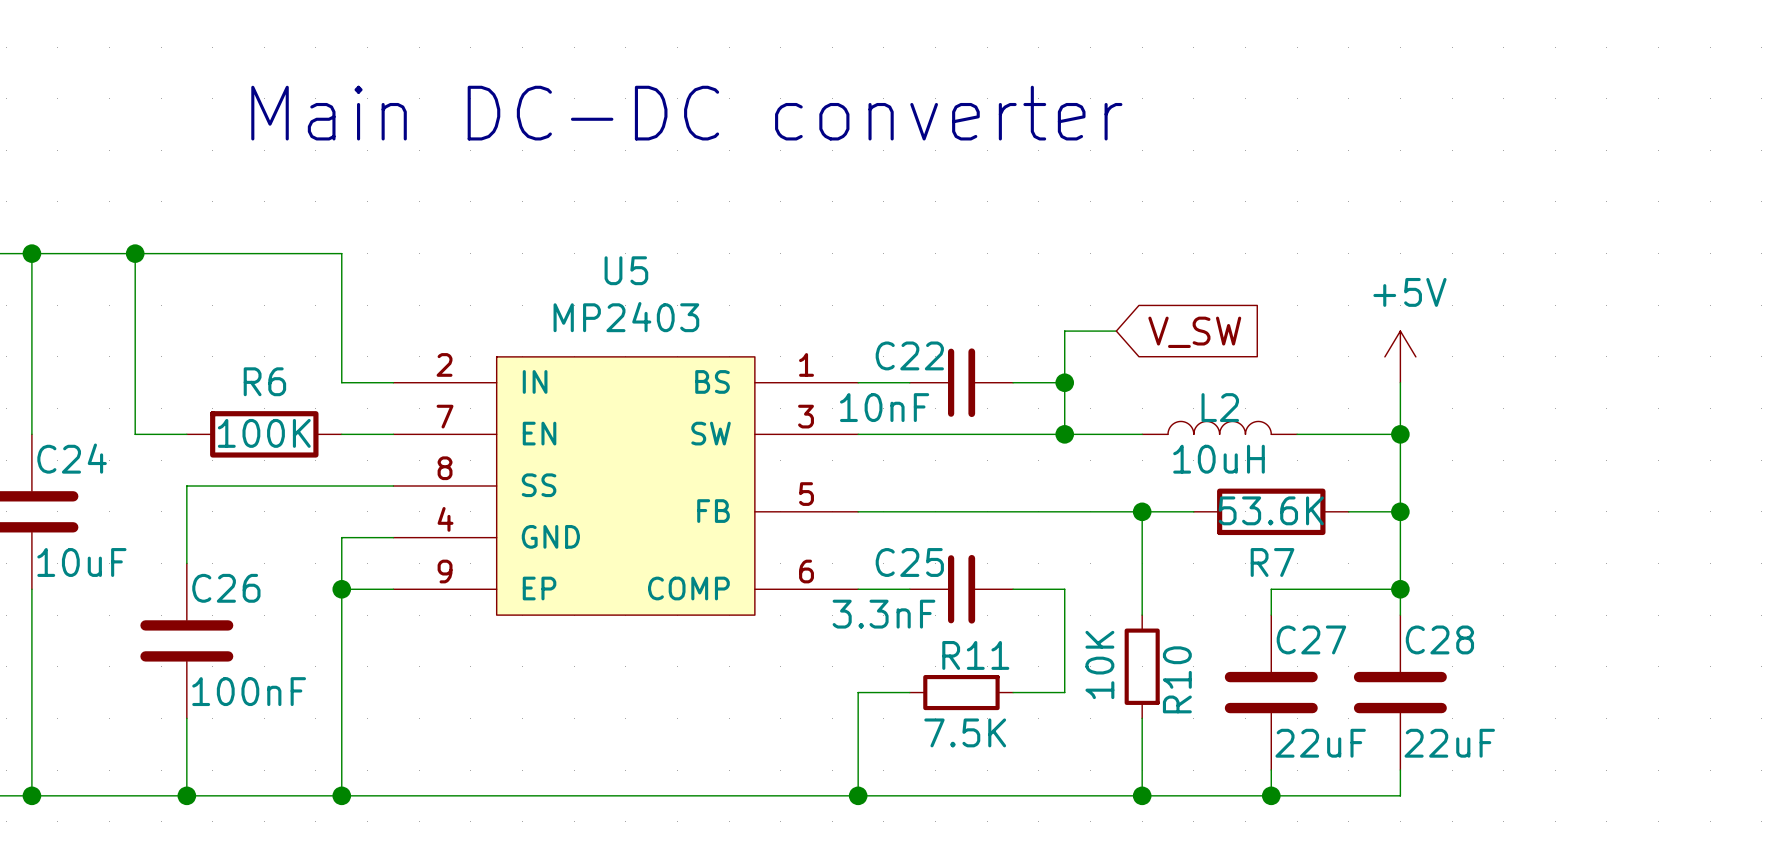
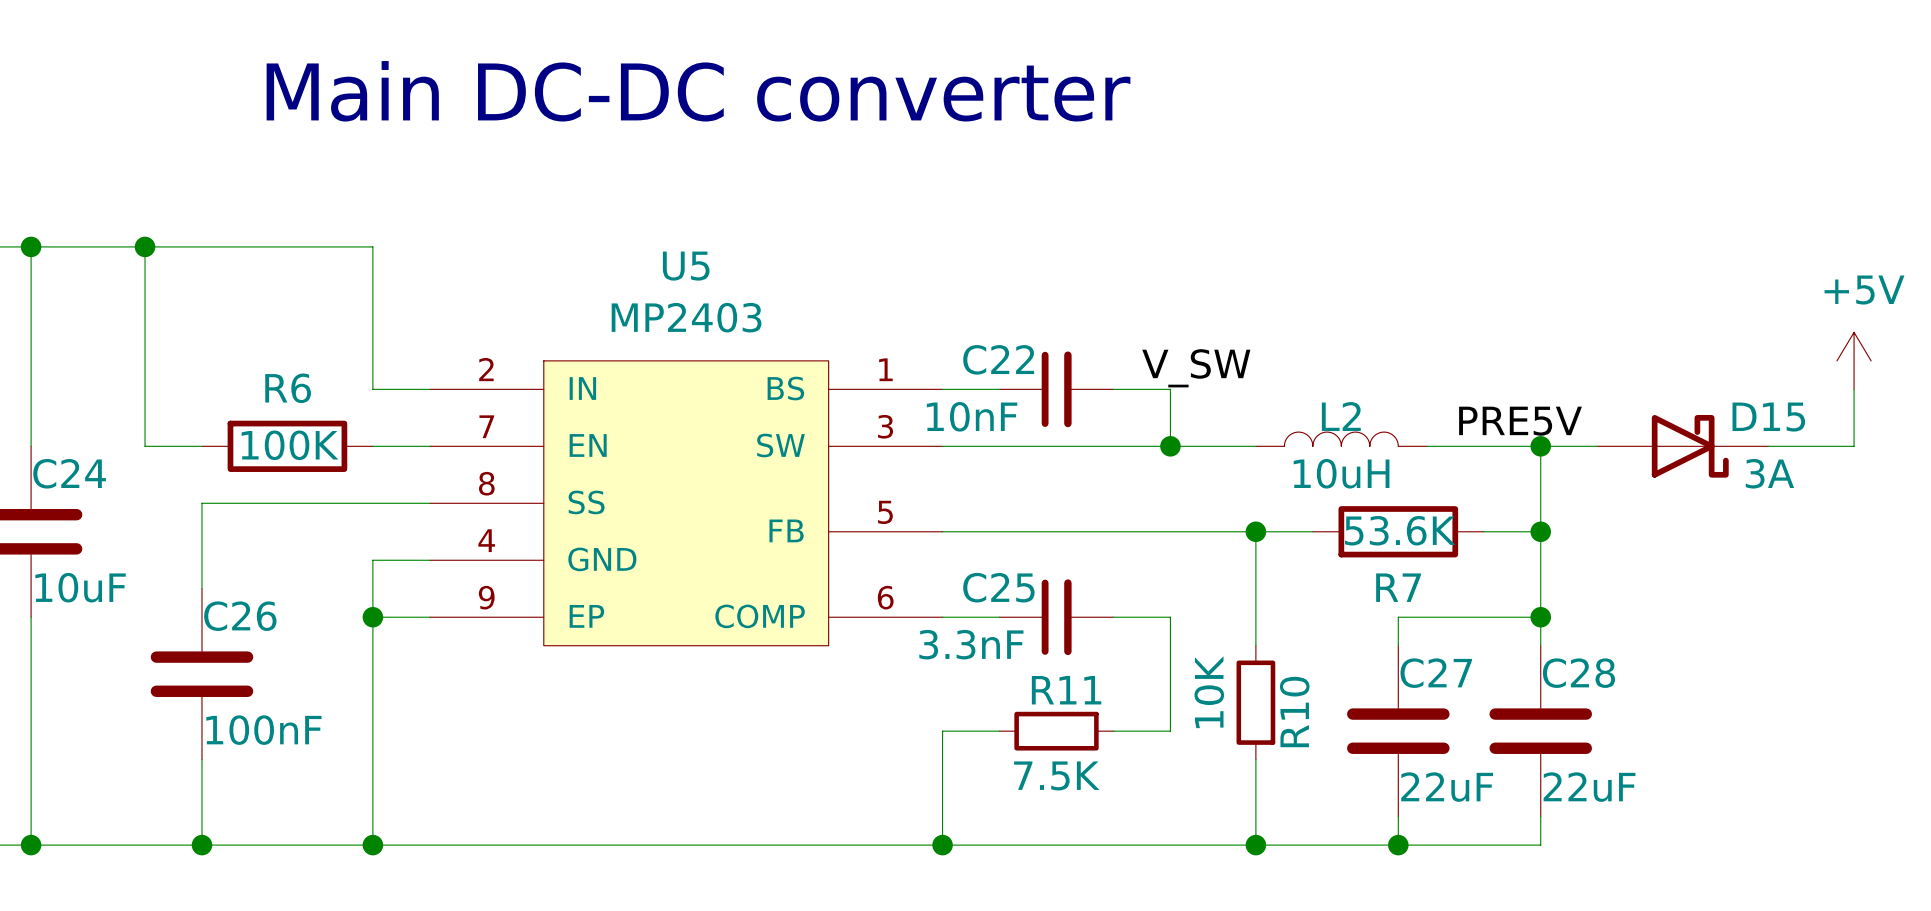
wire: (1116, 331) (1064, 331) (1064, 382) -> none
global label: V_SW (1194, 332) -> none
power symbol position: +5V (1400, 356) -> +5V (1854, 360)
label: none -> V_SW (1196, 368)
junction: (1064, 382) -> none
wire: (1400, 382) (1400, 434) -> (1597, 446) (1540, 446)
wire: none -> (1854, 389) (1854, 446) (1768, 446)
label: none -> PRE5V (1520, 421)
D15: none -> 3A (1683, 446)

